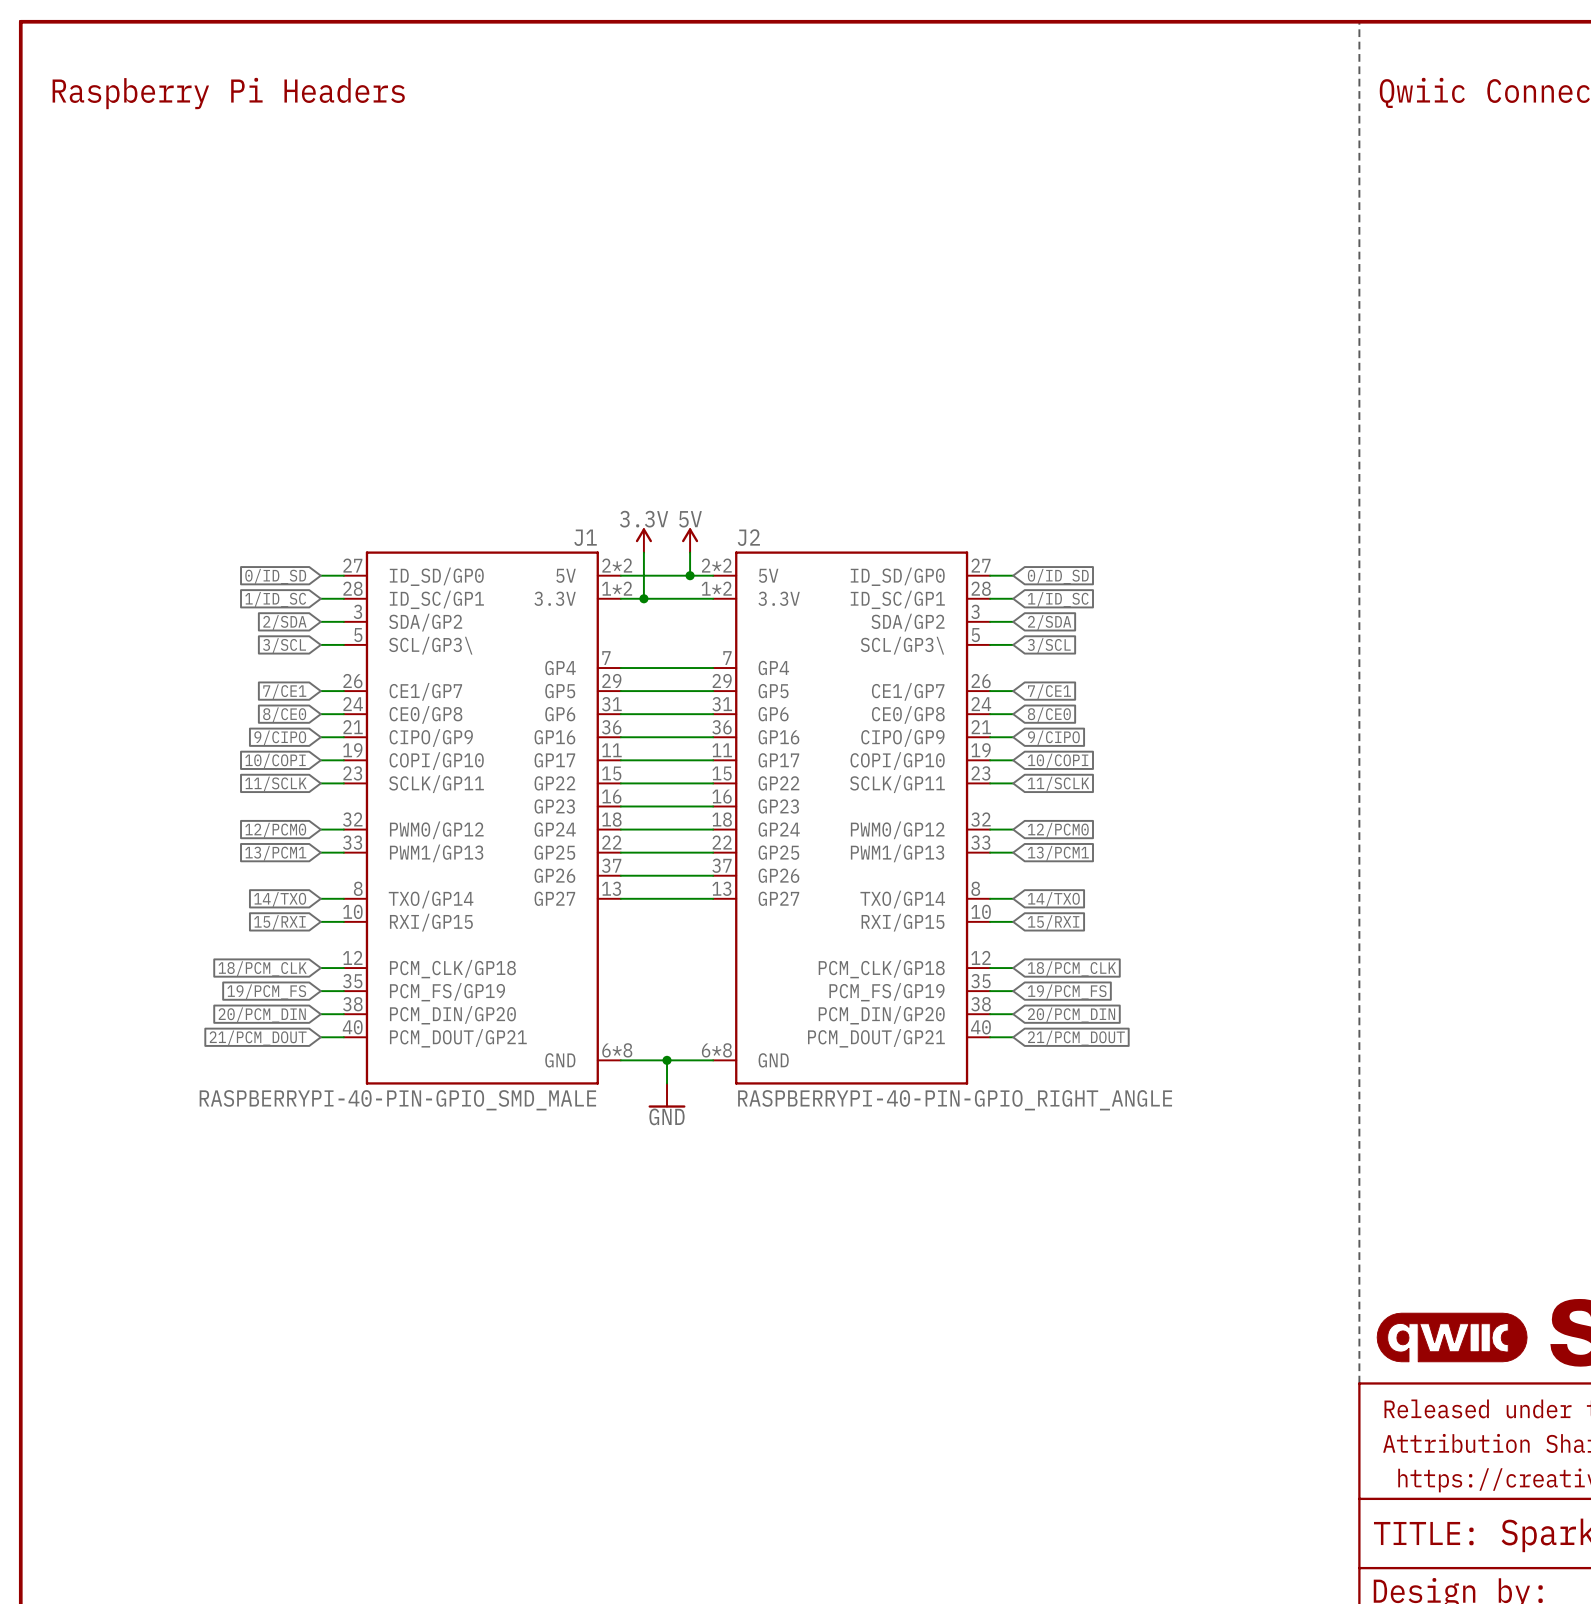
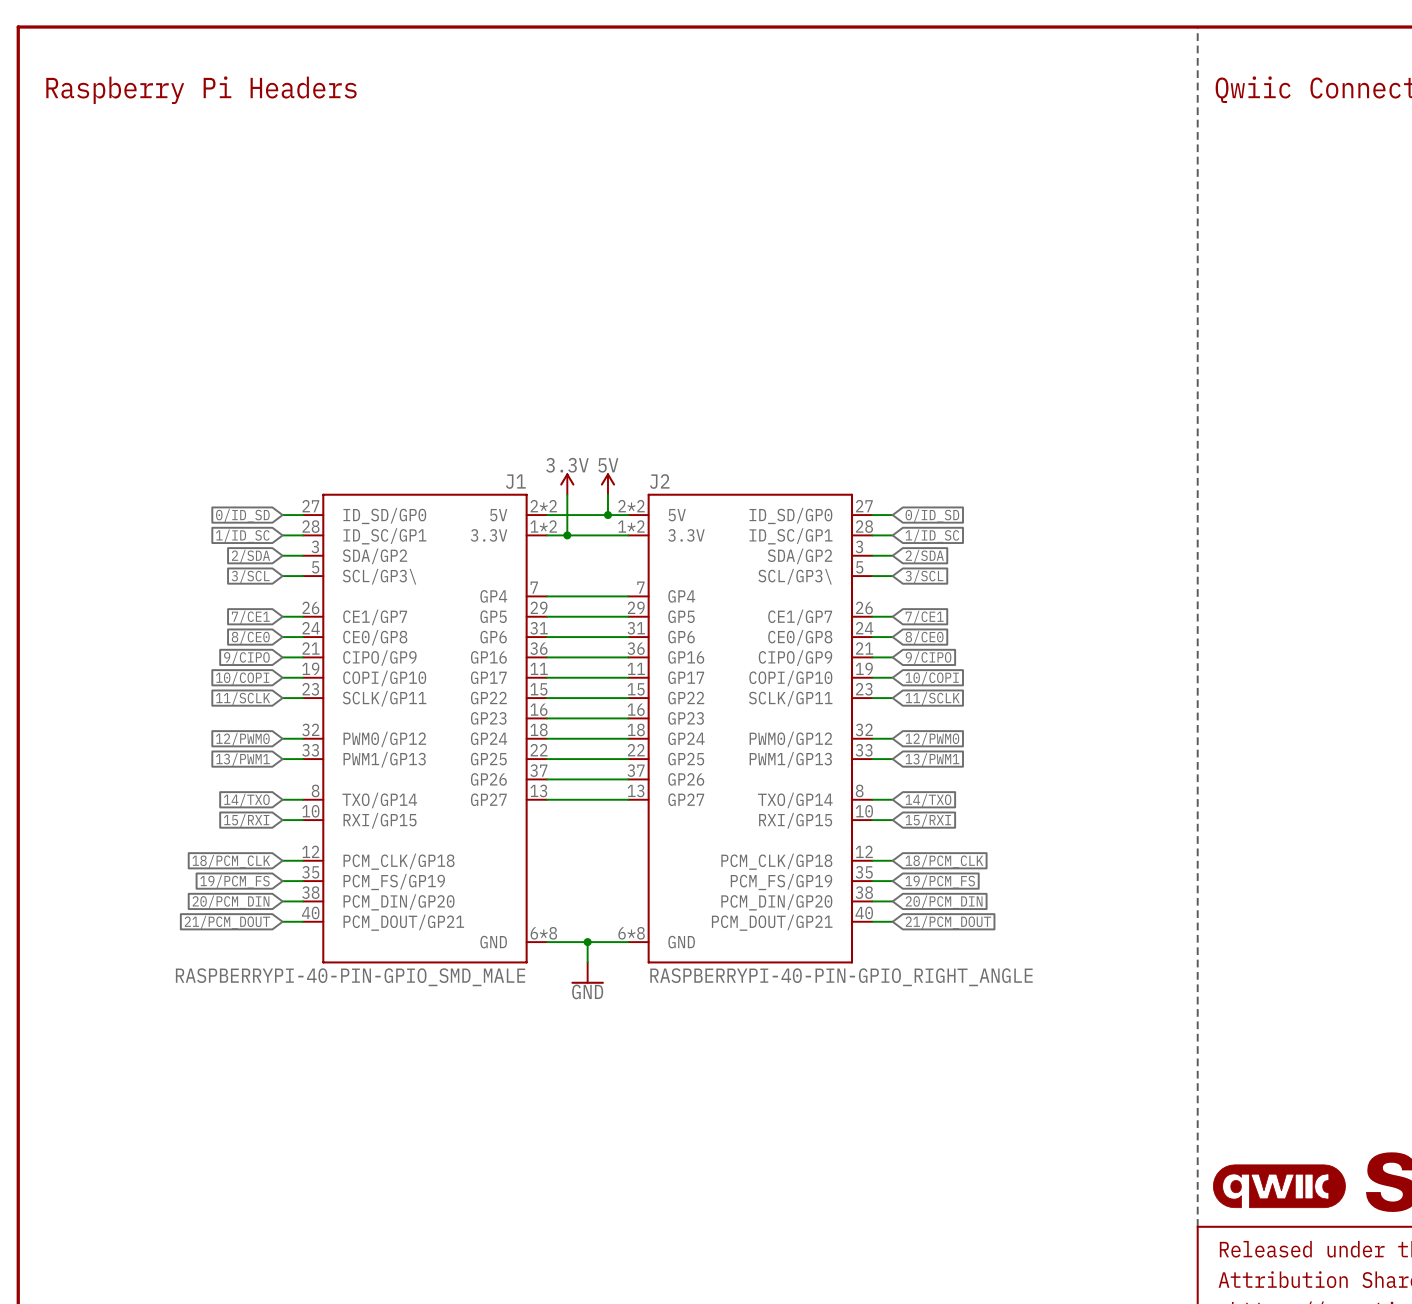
global label: 12/PCM0 (275, 830) -> 12/PWM0 (242, 739)
global label: 12/PCM0 (1058, 830) -> 12/PWM0 (932, 739)
global label: 13/PCM1 (275, 853) -> 13/PWM1 (242, 759)
global label: 13/PCM1 (1058, 853) -> 13/PWM1 (932, 759)

